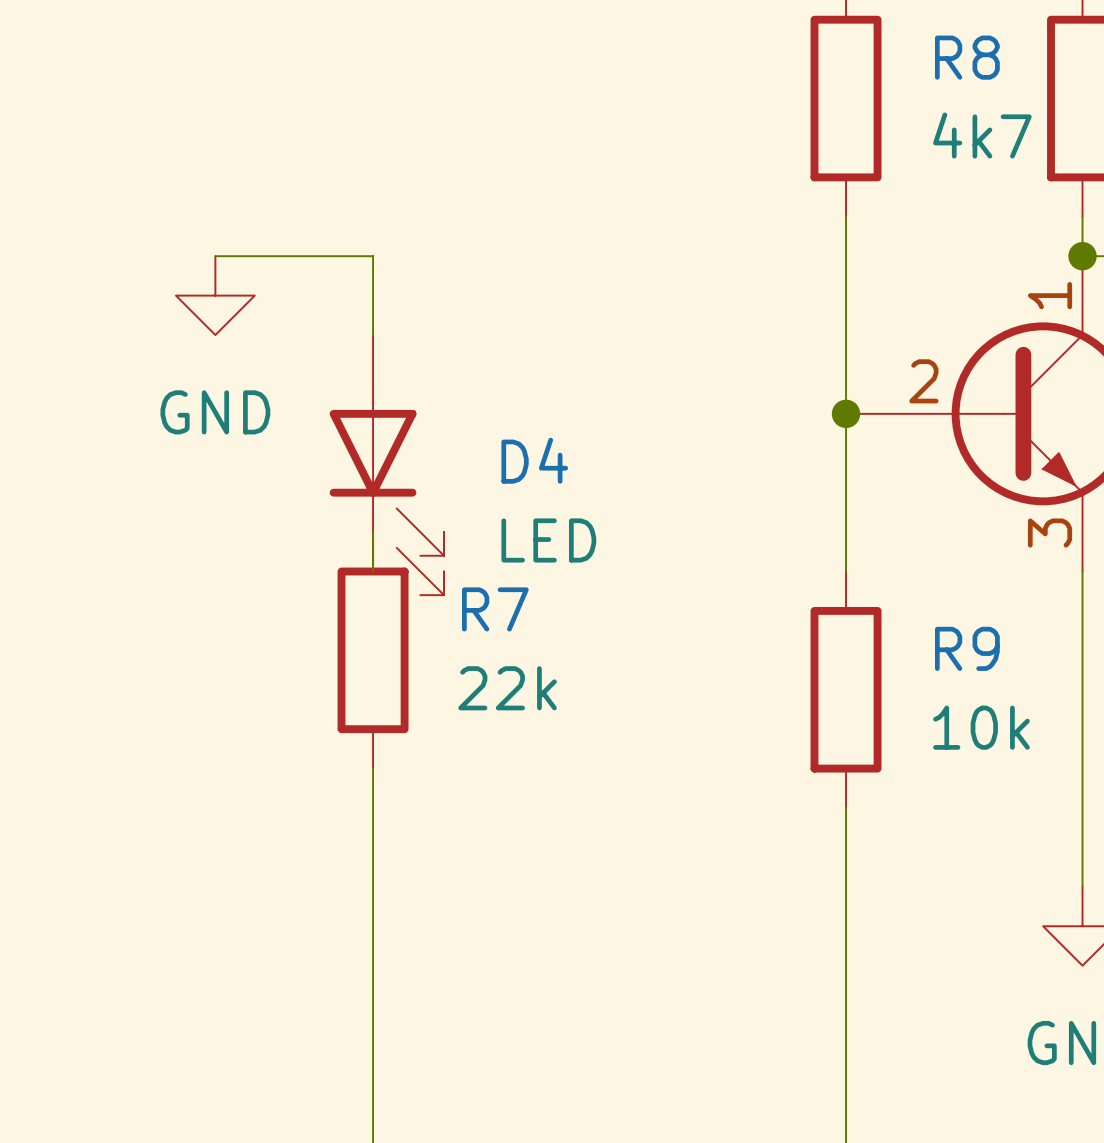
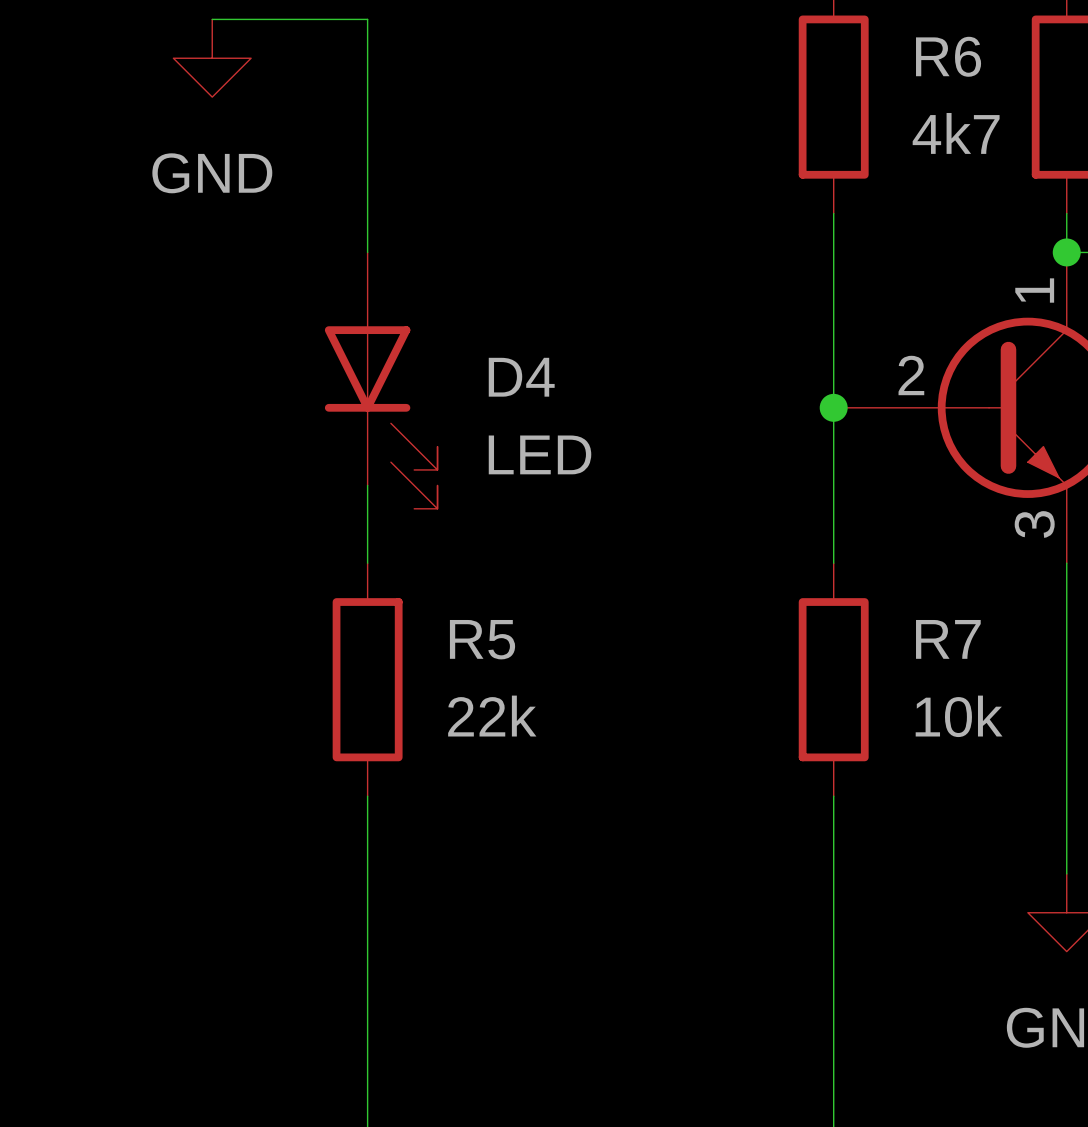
wire: none -> (212, 19) (367, 19) (367, 252)
R8 name: R8 (967, 57) -> R6 (948, 56)
wire: (215, 256) (373, 256) (373, 335) -> none
power symbol position: GND (215, 295) -> GND (212, 58)
D4 position: (386, 465) -> (381, 380)
R9 name: R9 (967, 648) -> R7 (948, 639)
R7: 22k (373, 650) -> none
R5: none -> 22k (367, 679)

